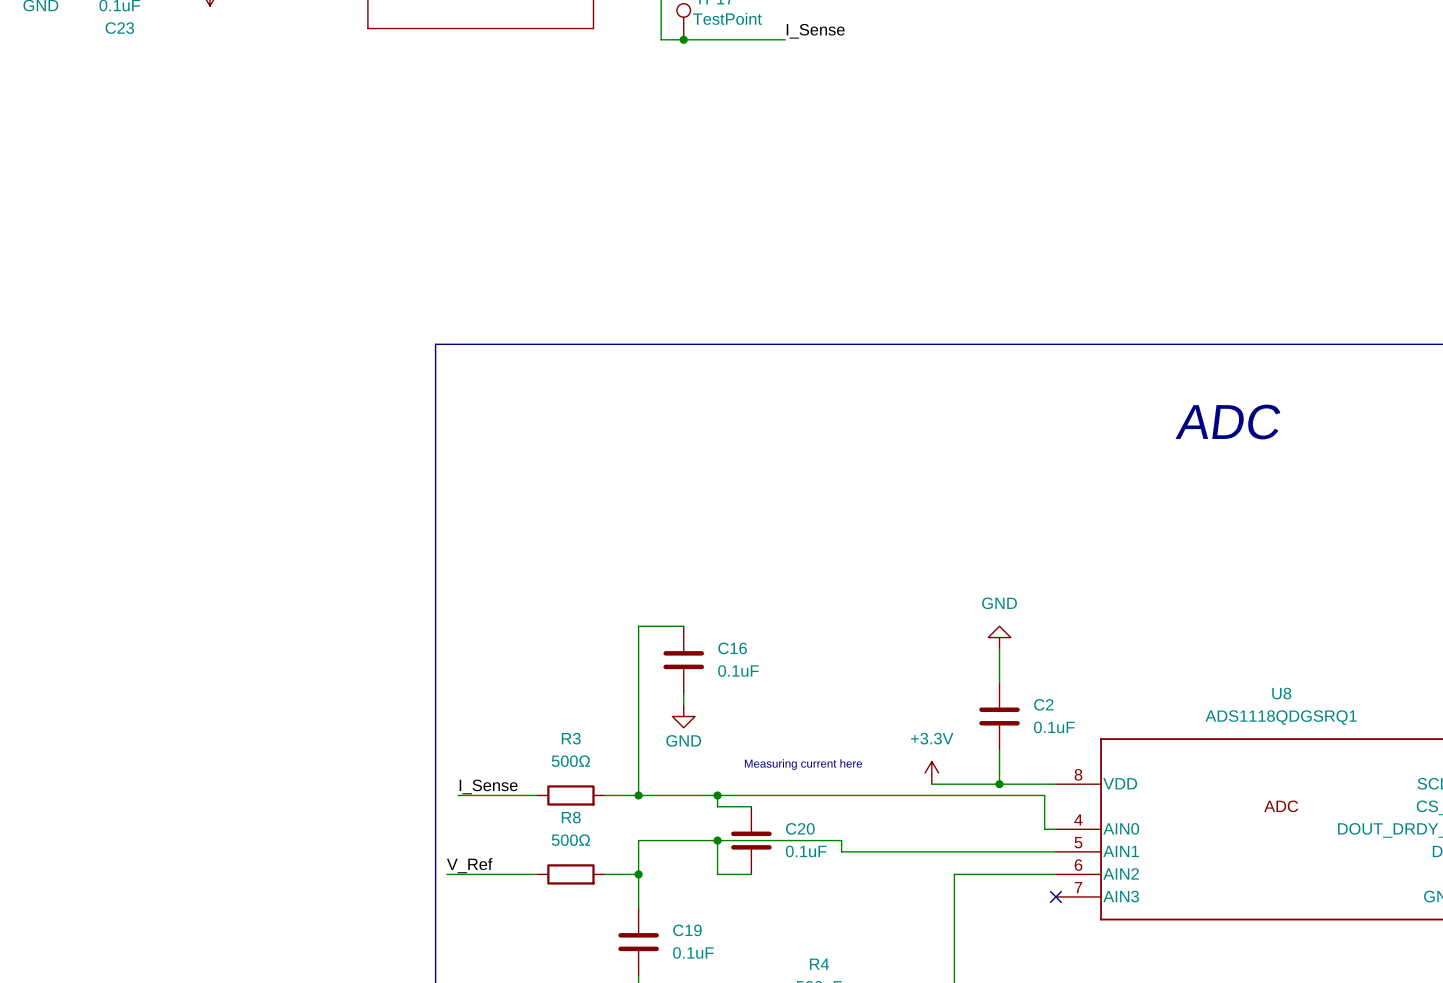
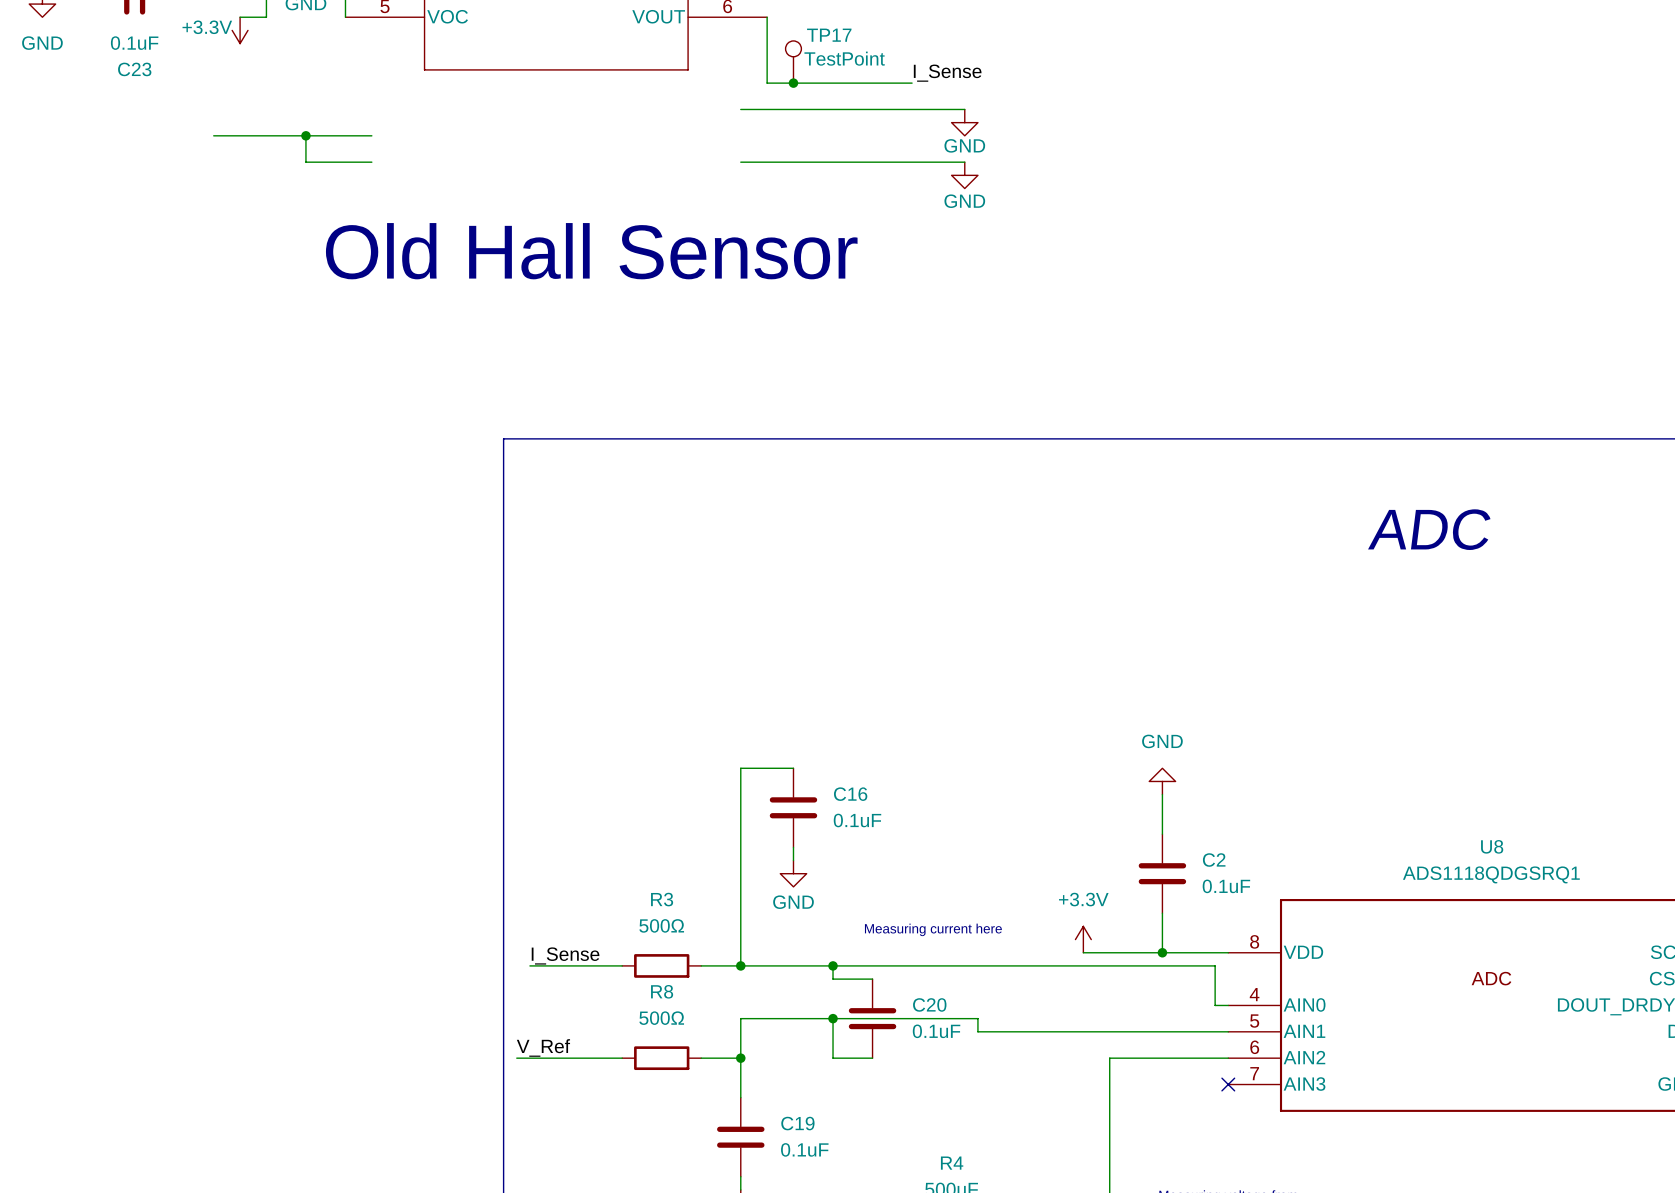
wire: none -> (740, 109) (964, 109)
power symbol: none -> GND (964, 122)
wire: none -> (213, 135) (371, 135)
wire: none -> (305, 135) (305, 162) (371, 162)
junction: none -> (305, 135)
wire: none -> (740, 162) (964, 162)
power symbol: none -> GND (964, 175)
text: none -> Old Hall Sensor (591, 251)

